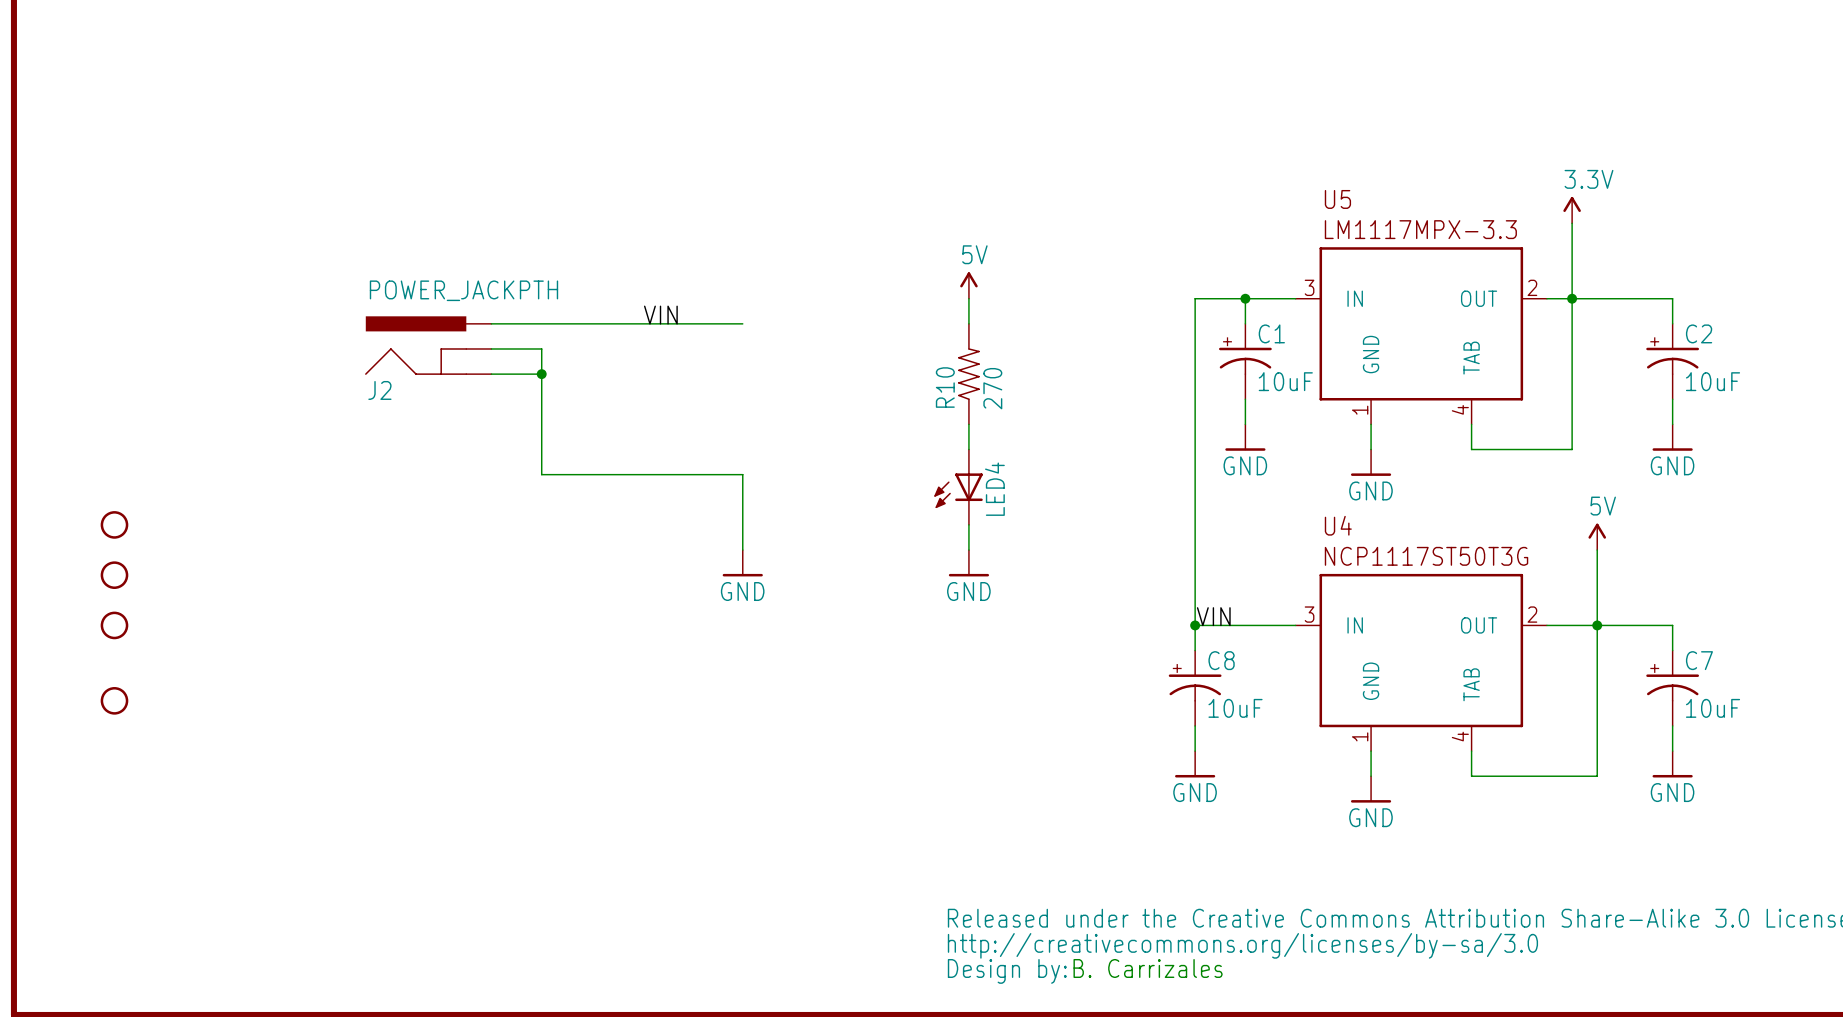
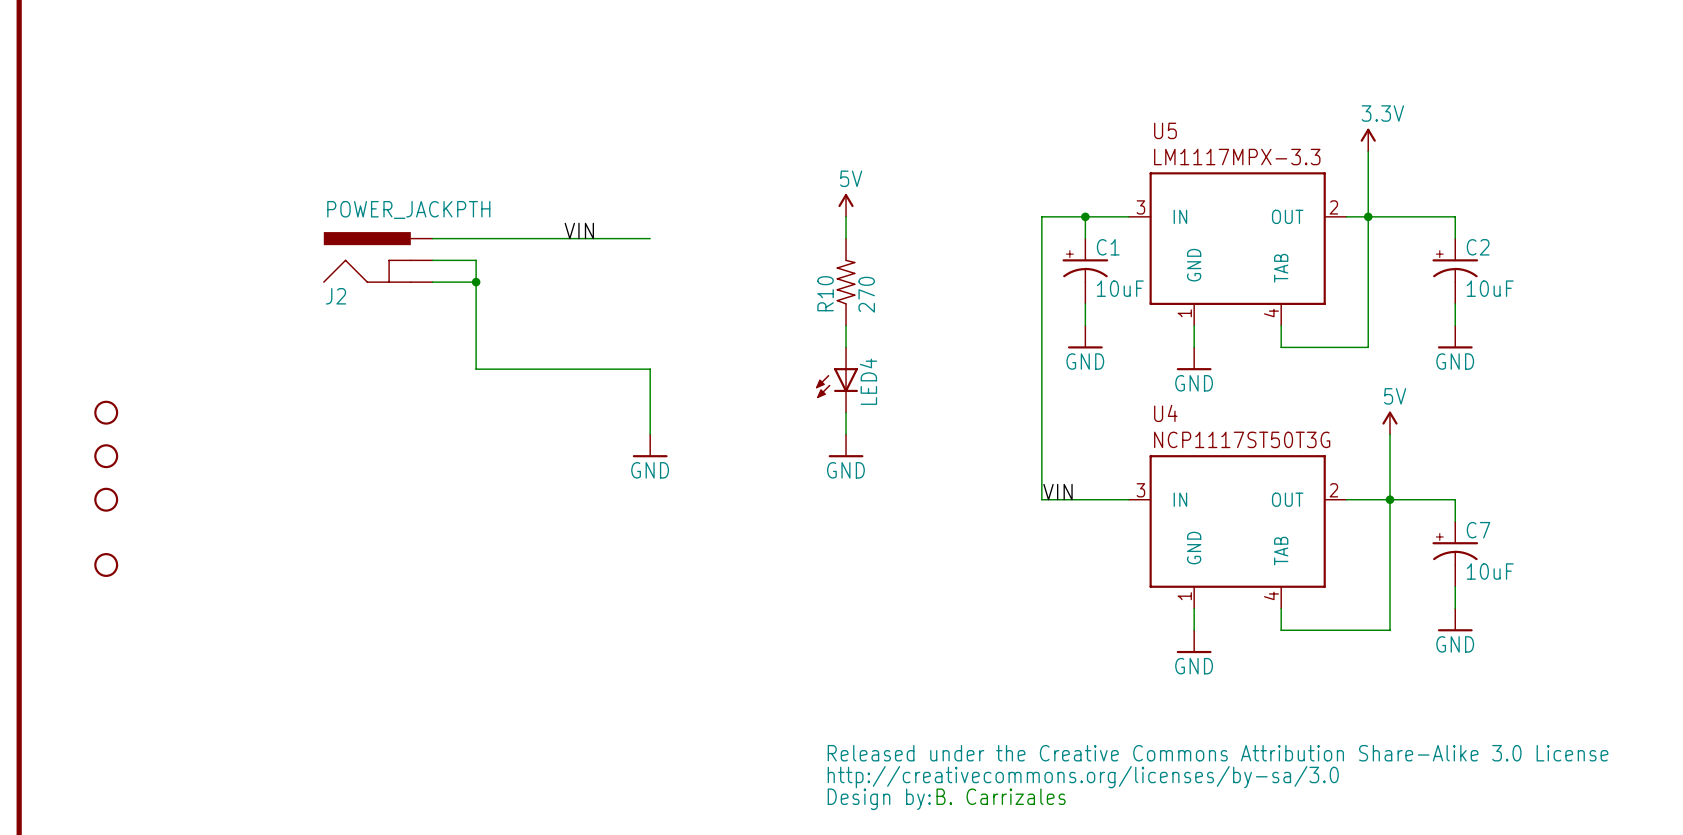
wire: (1195, 625) (1195, 650) -> none
junction: (1195, 625) -> none
C8: 10uF (1195, 688) -> none
wire: (1195, 725) (1195, 751) -> none
power symbol: GND (1195, 764) -> none

